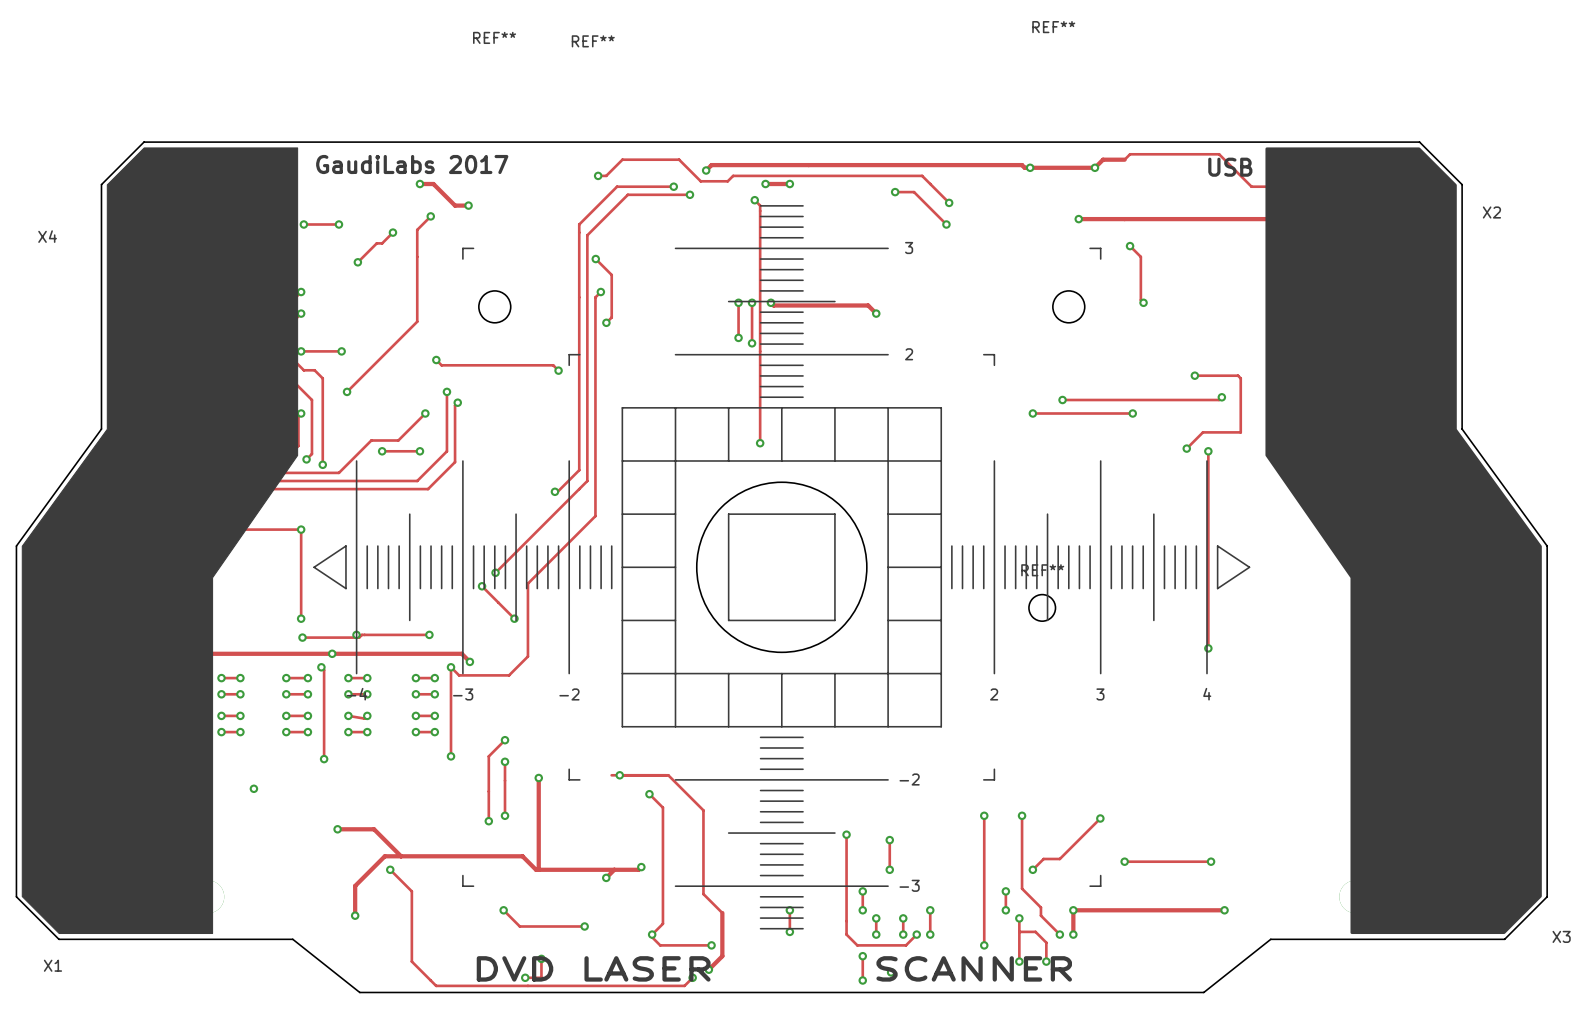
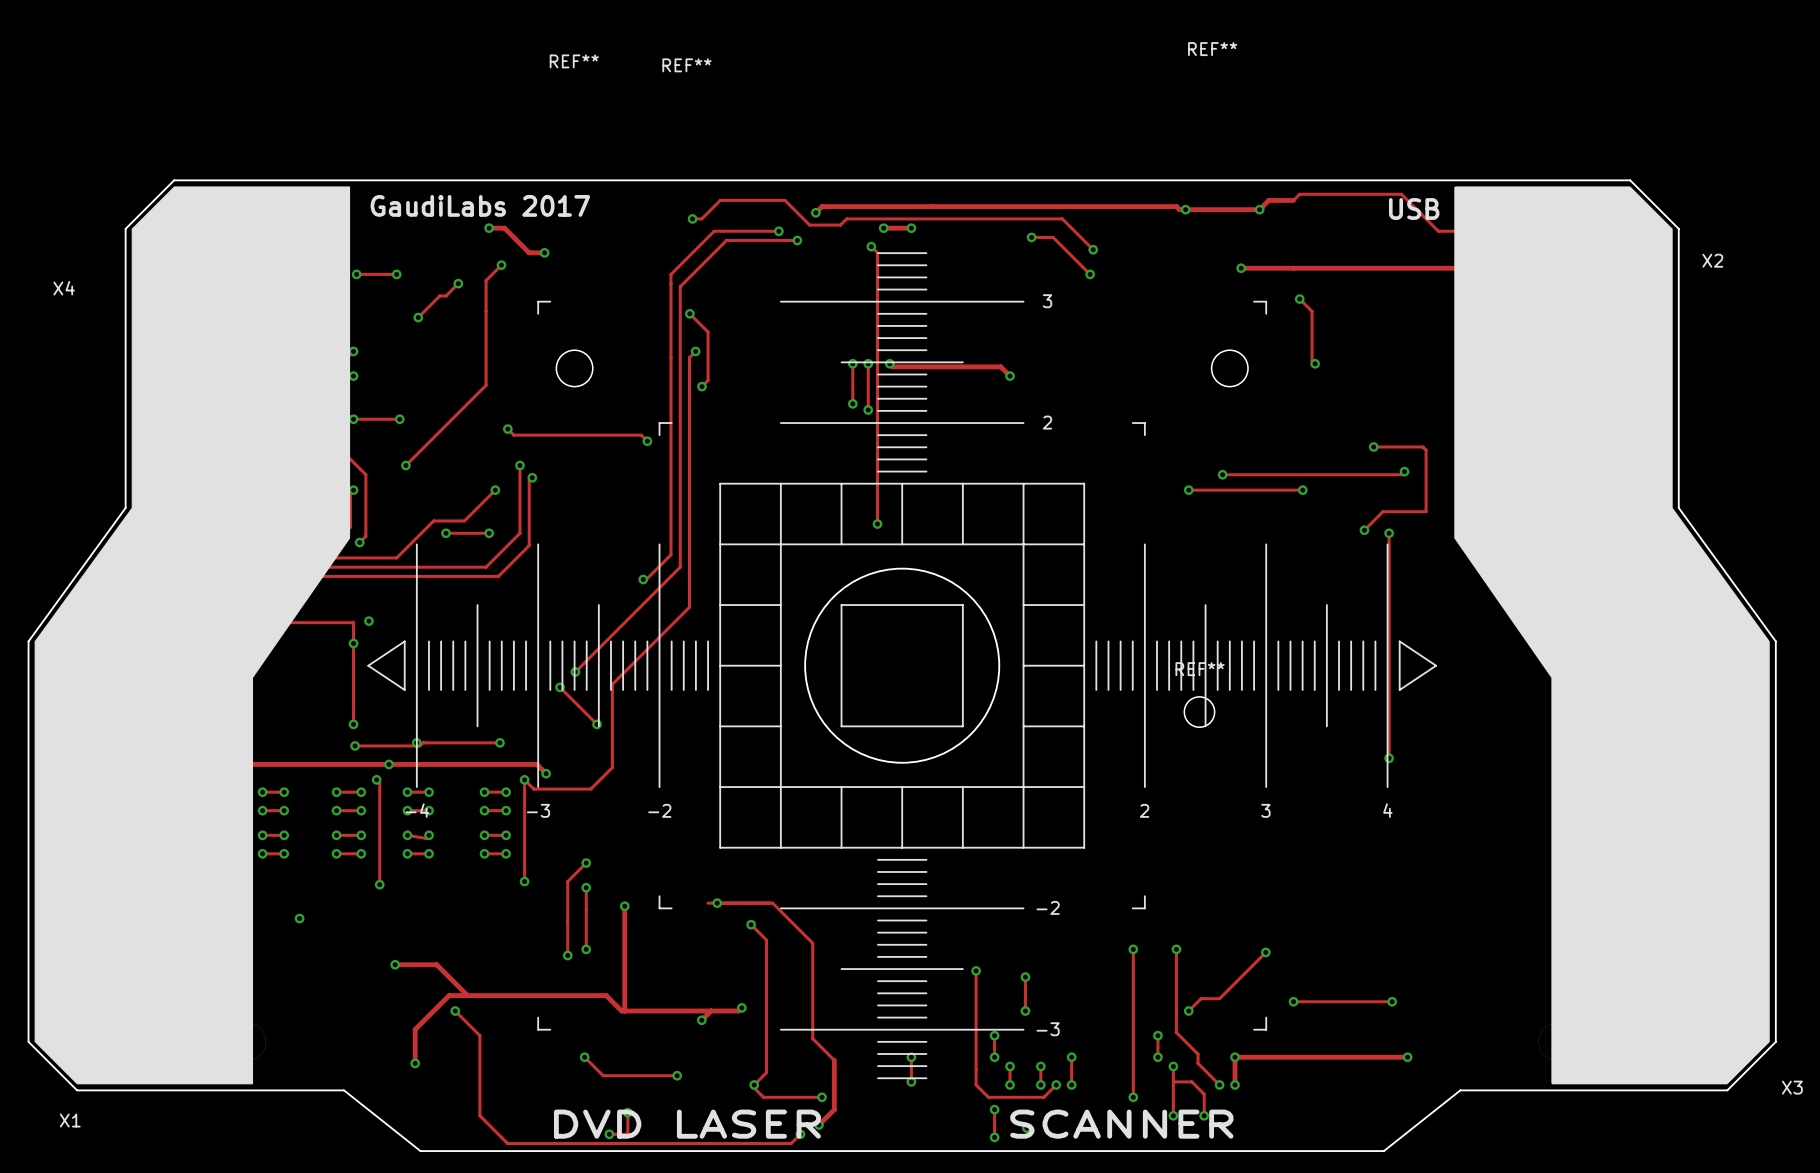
track: (301, 313) (293, 321) (293, 359) (303, 370) (314, 370) (322, 378) (322, 464) -> none
via: (322, 464) -> none
via: none -> (368, 621)
via: (301, 529) -> none
via: none -> (353, 643)

